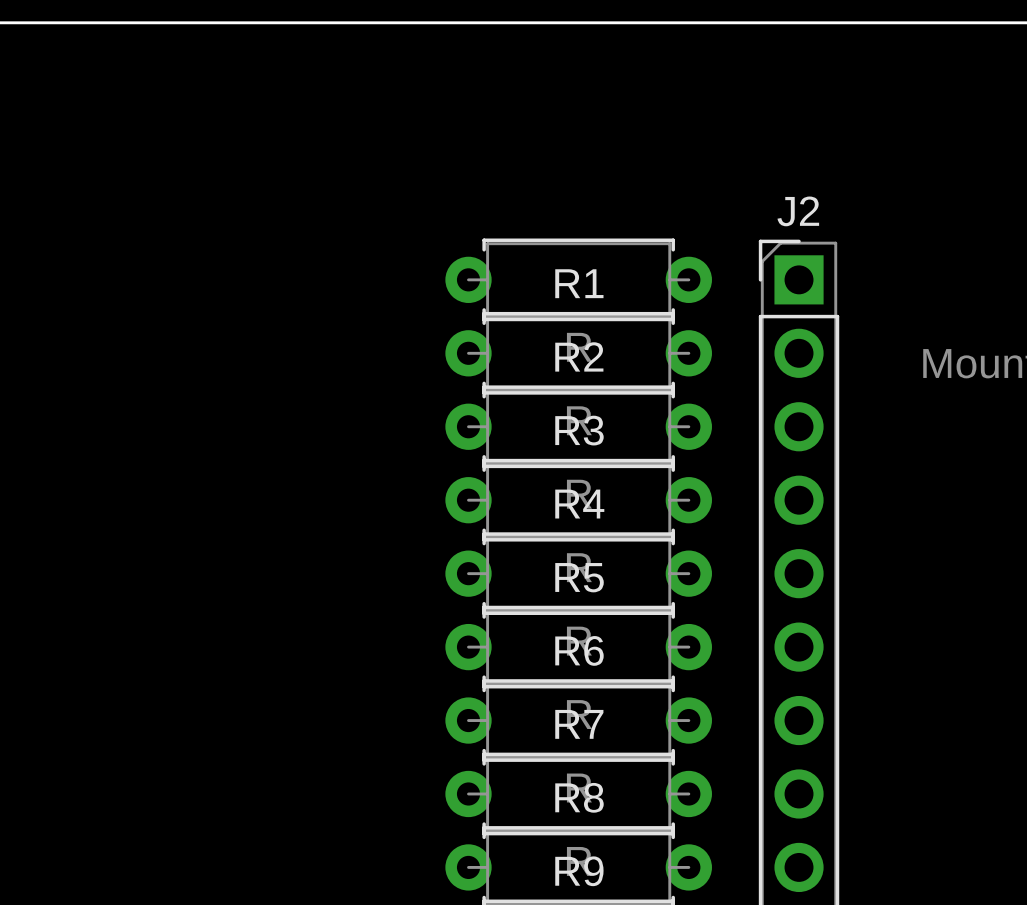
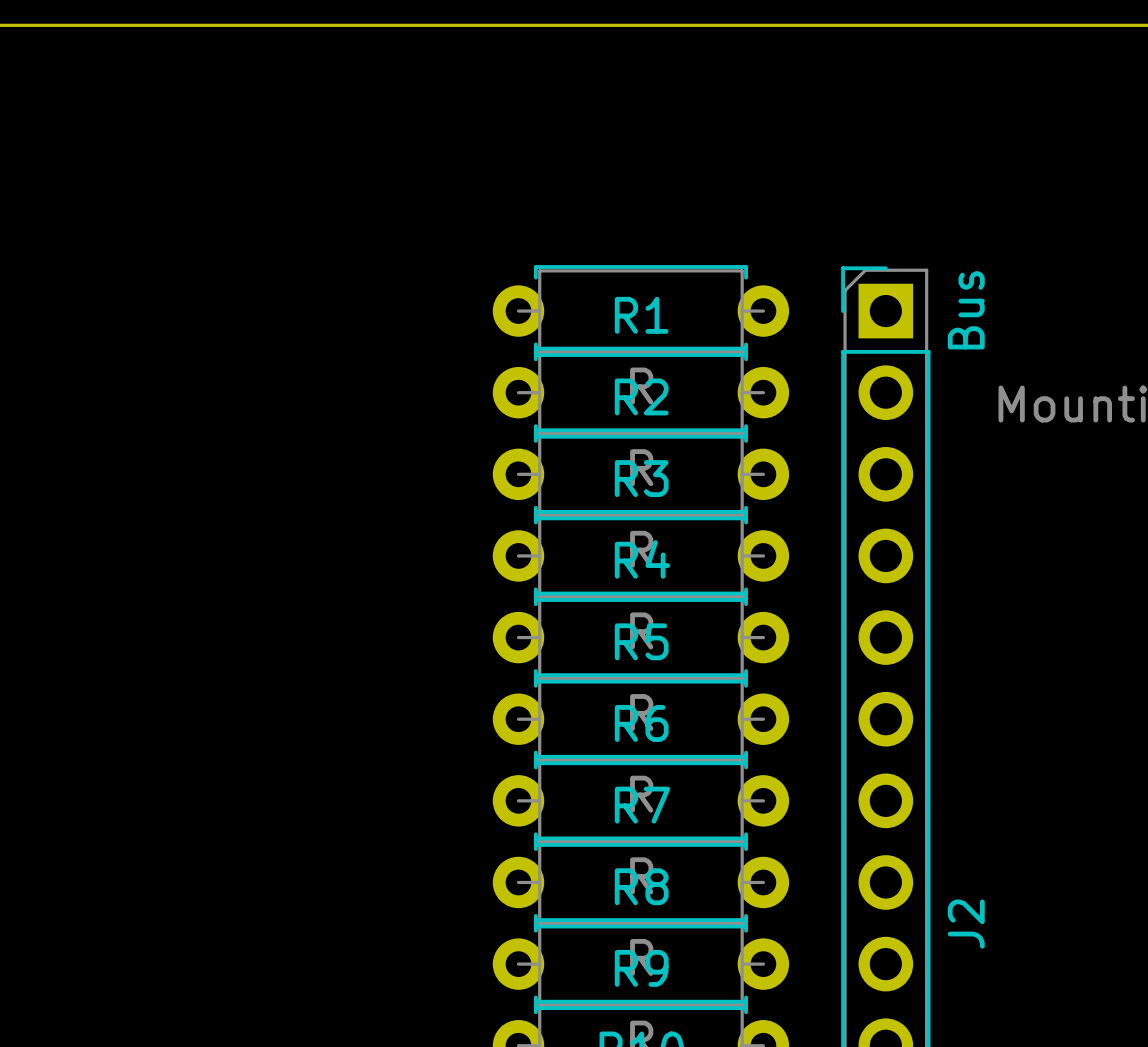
J2 name rotation: 0° (798, 211) -> 90° counterclockwise (966, 924)
J2 name position: J2 (798, 211) -> J2 (966, 924)
text: none -> Bus (966, 310)

